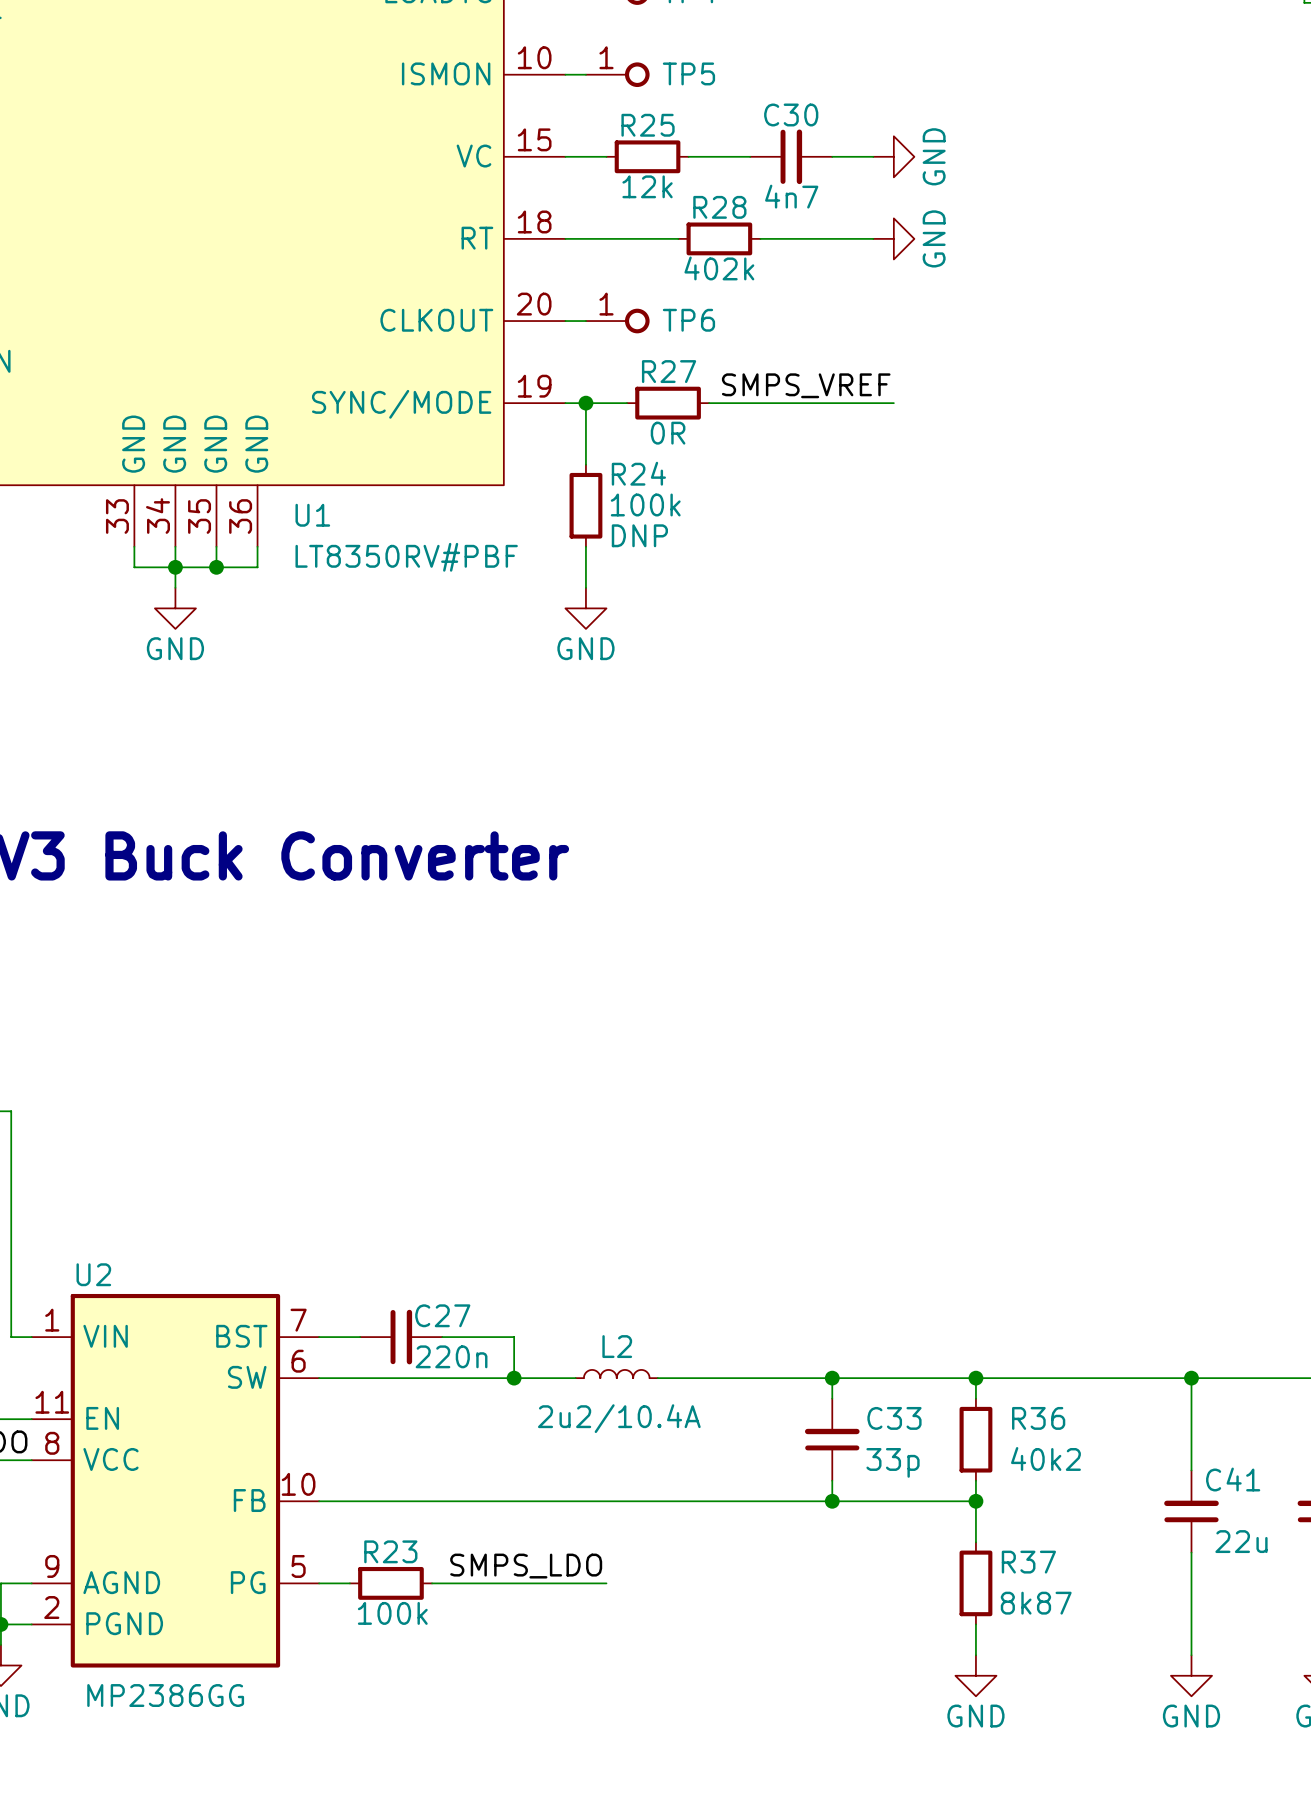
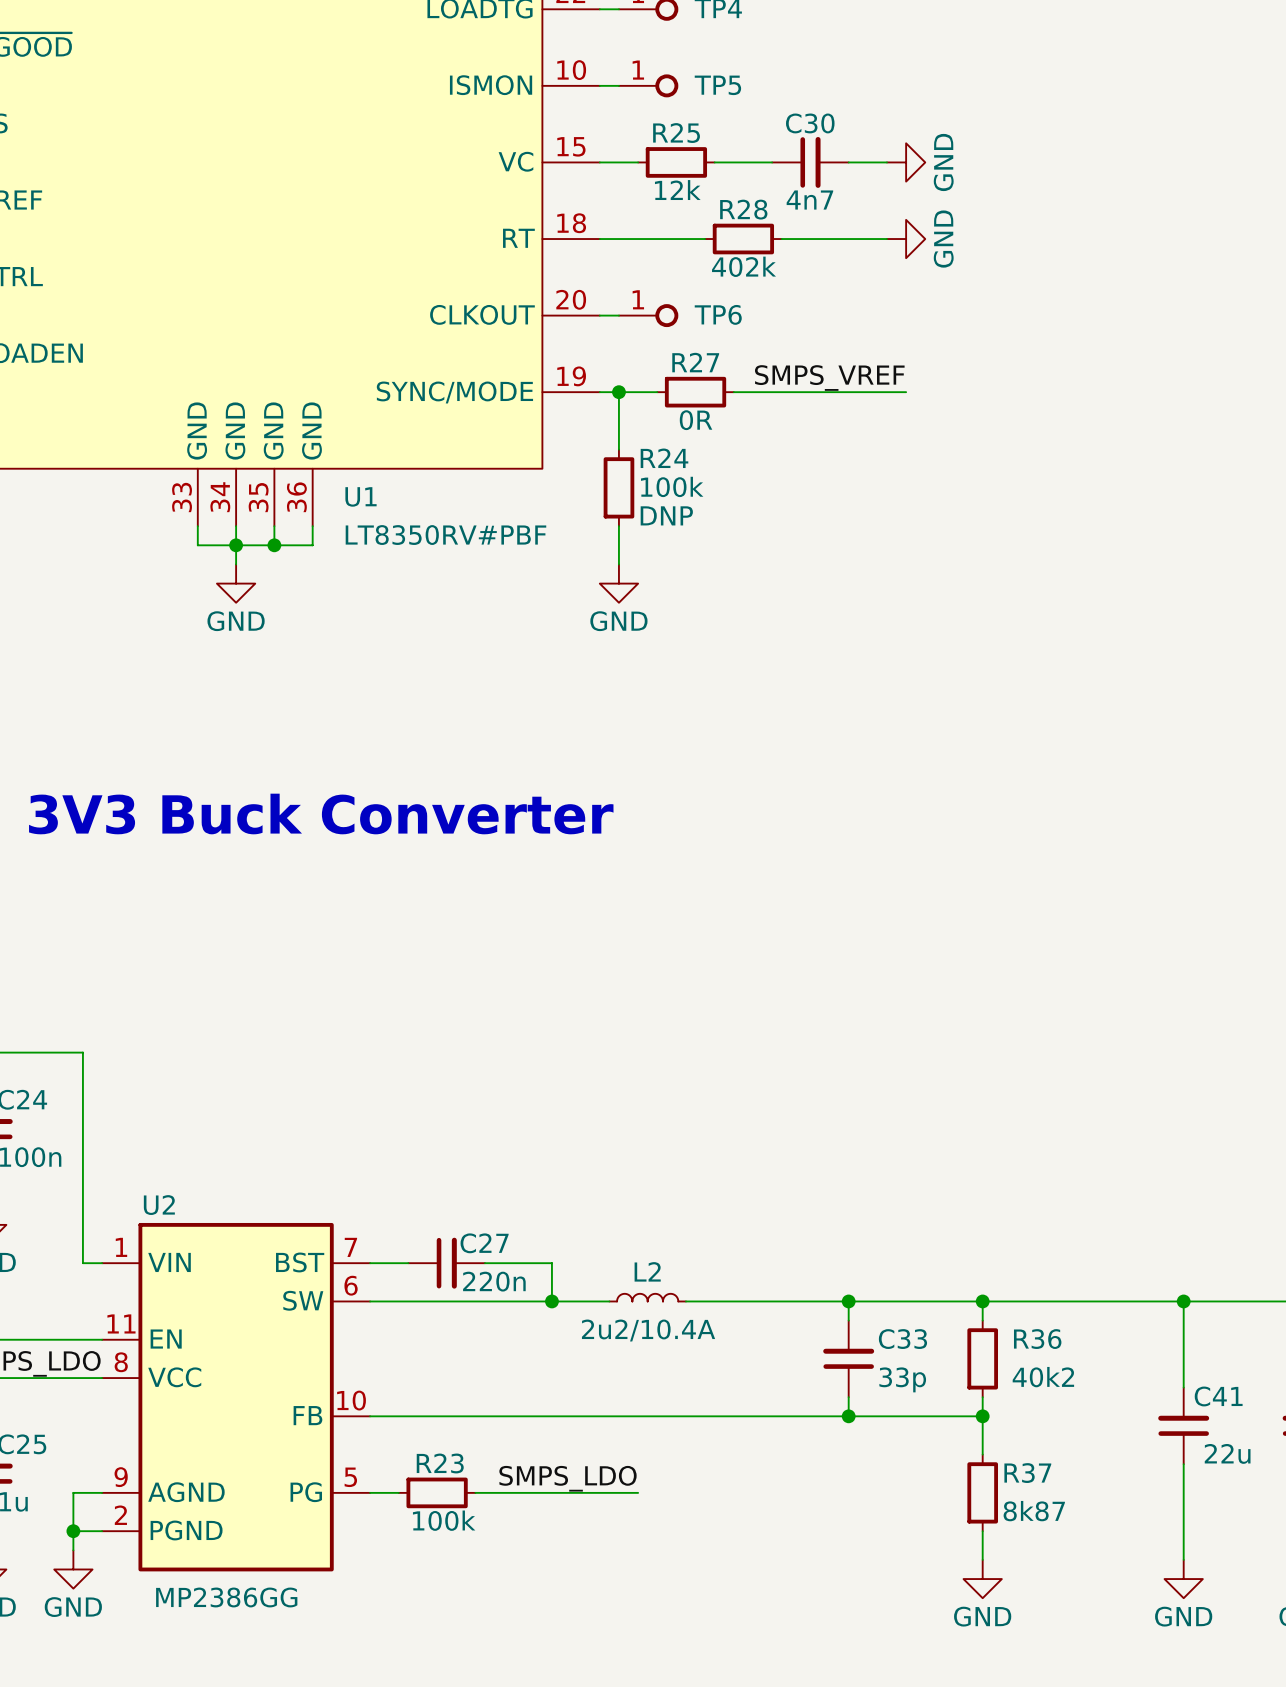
L2 text position: 2u2/10.4A (619, 1418) -> 2u2/10.4A (648, 1330)

